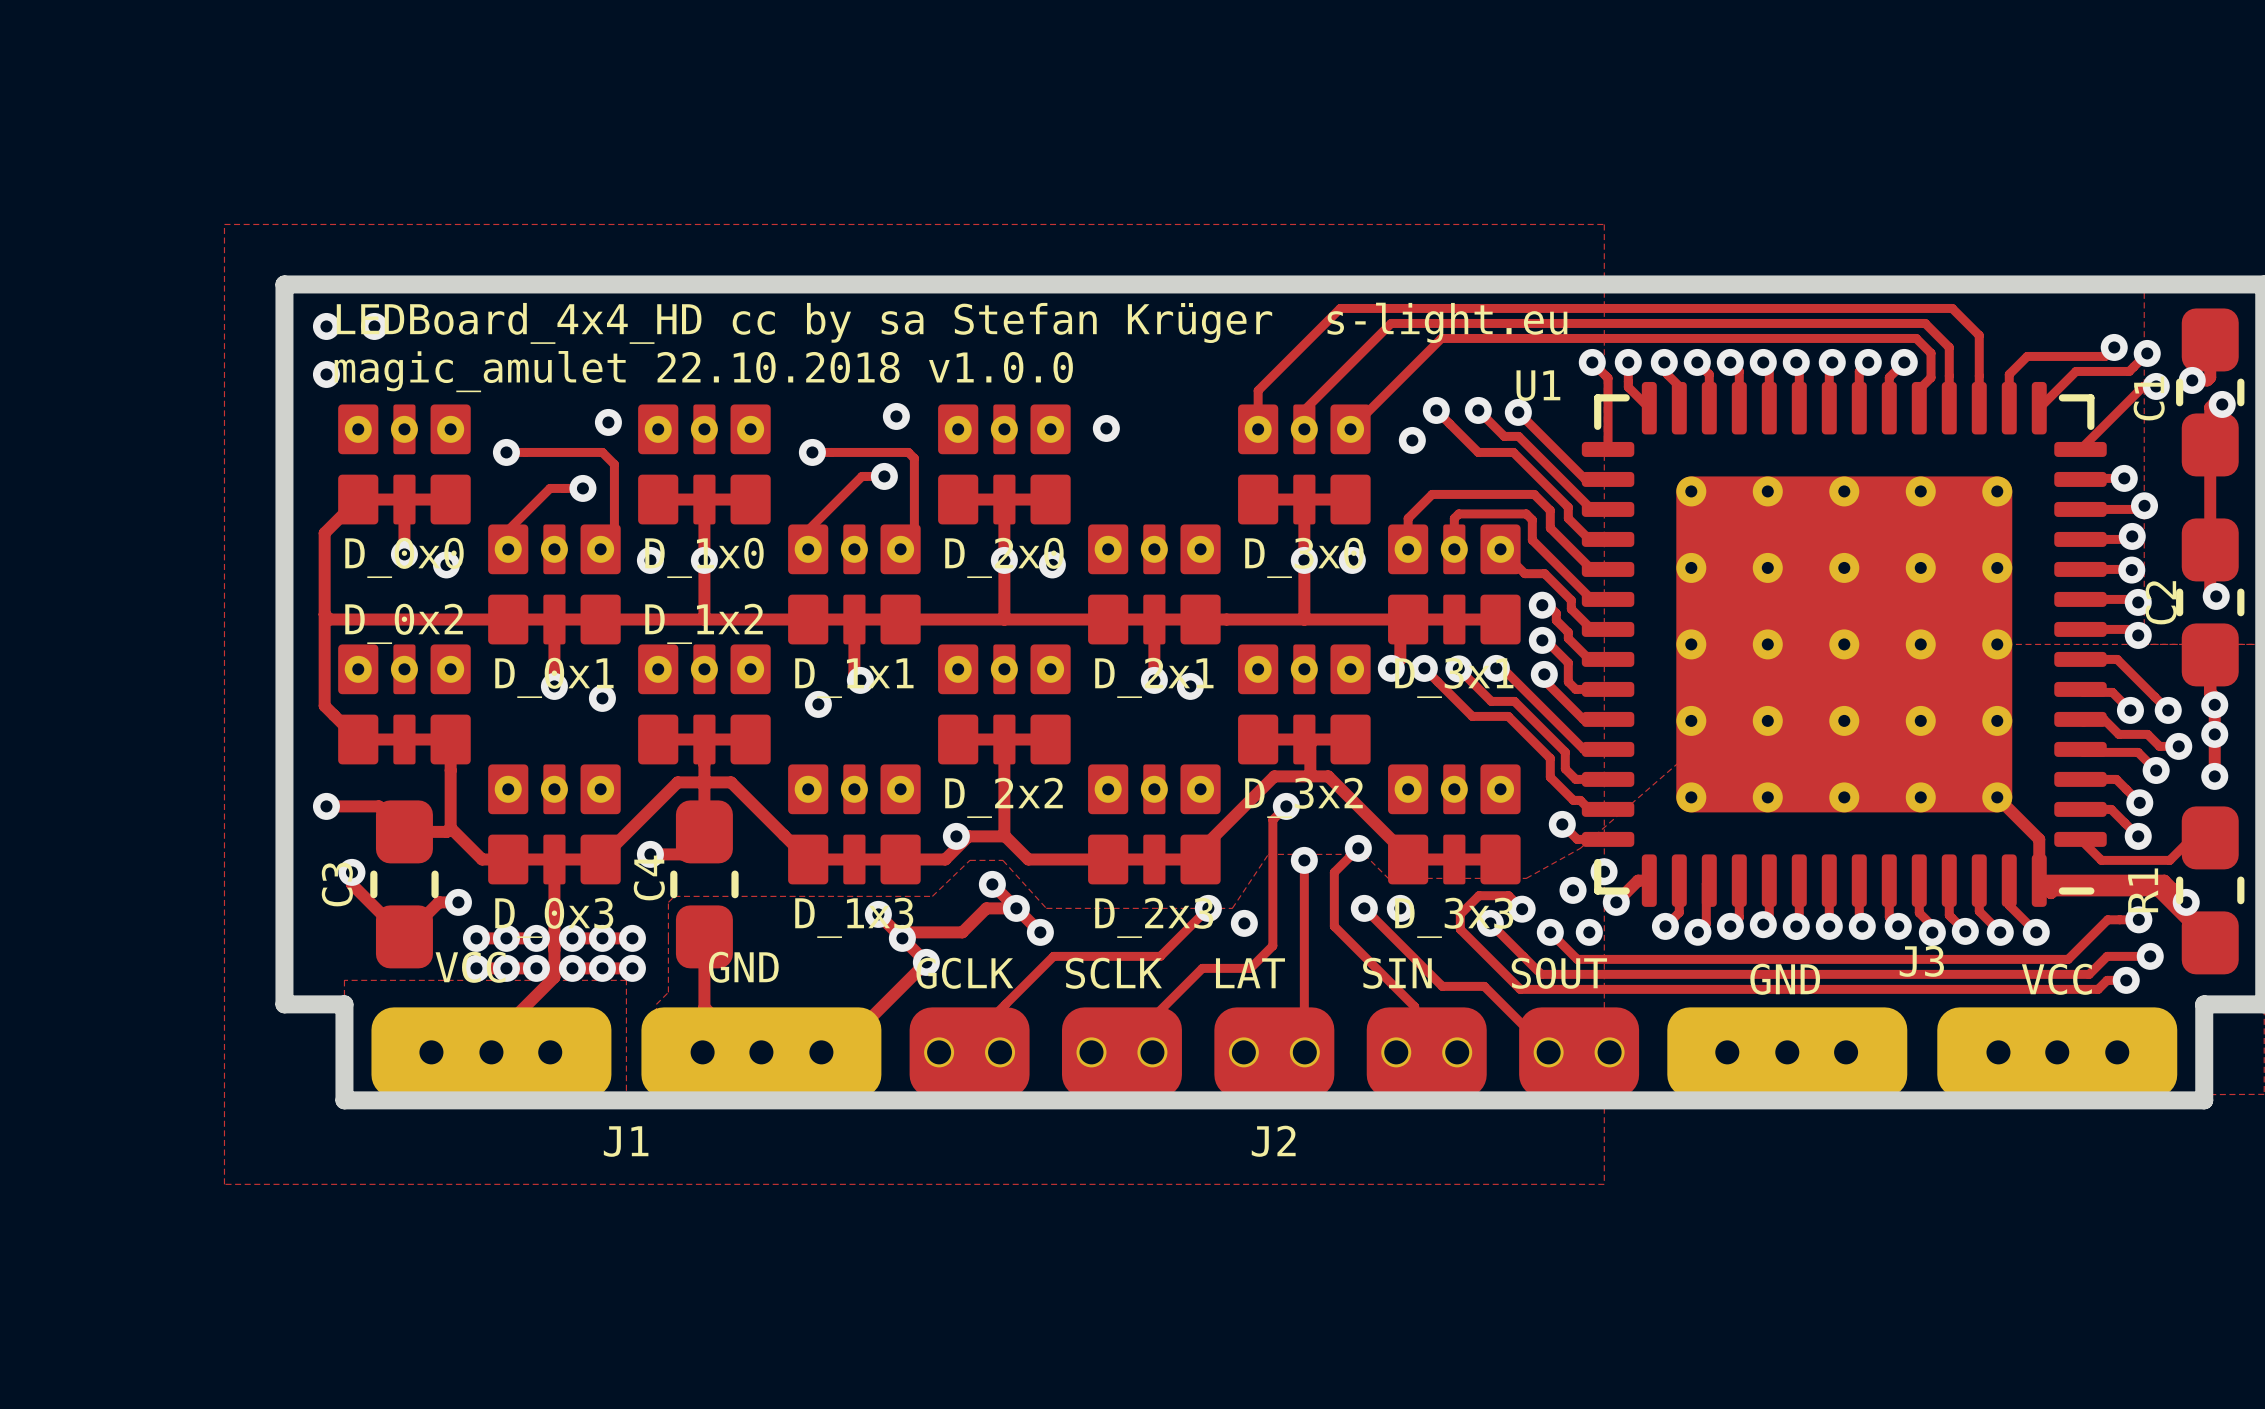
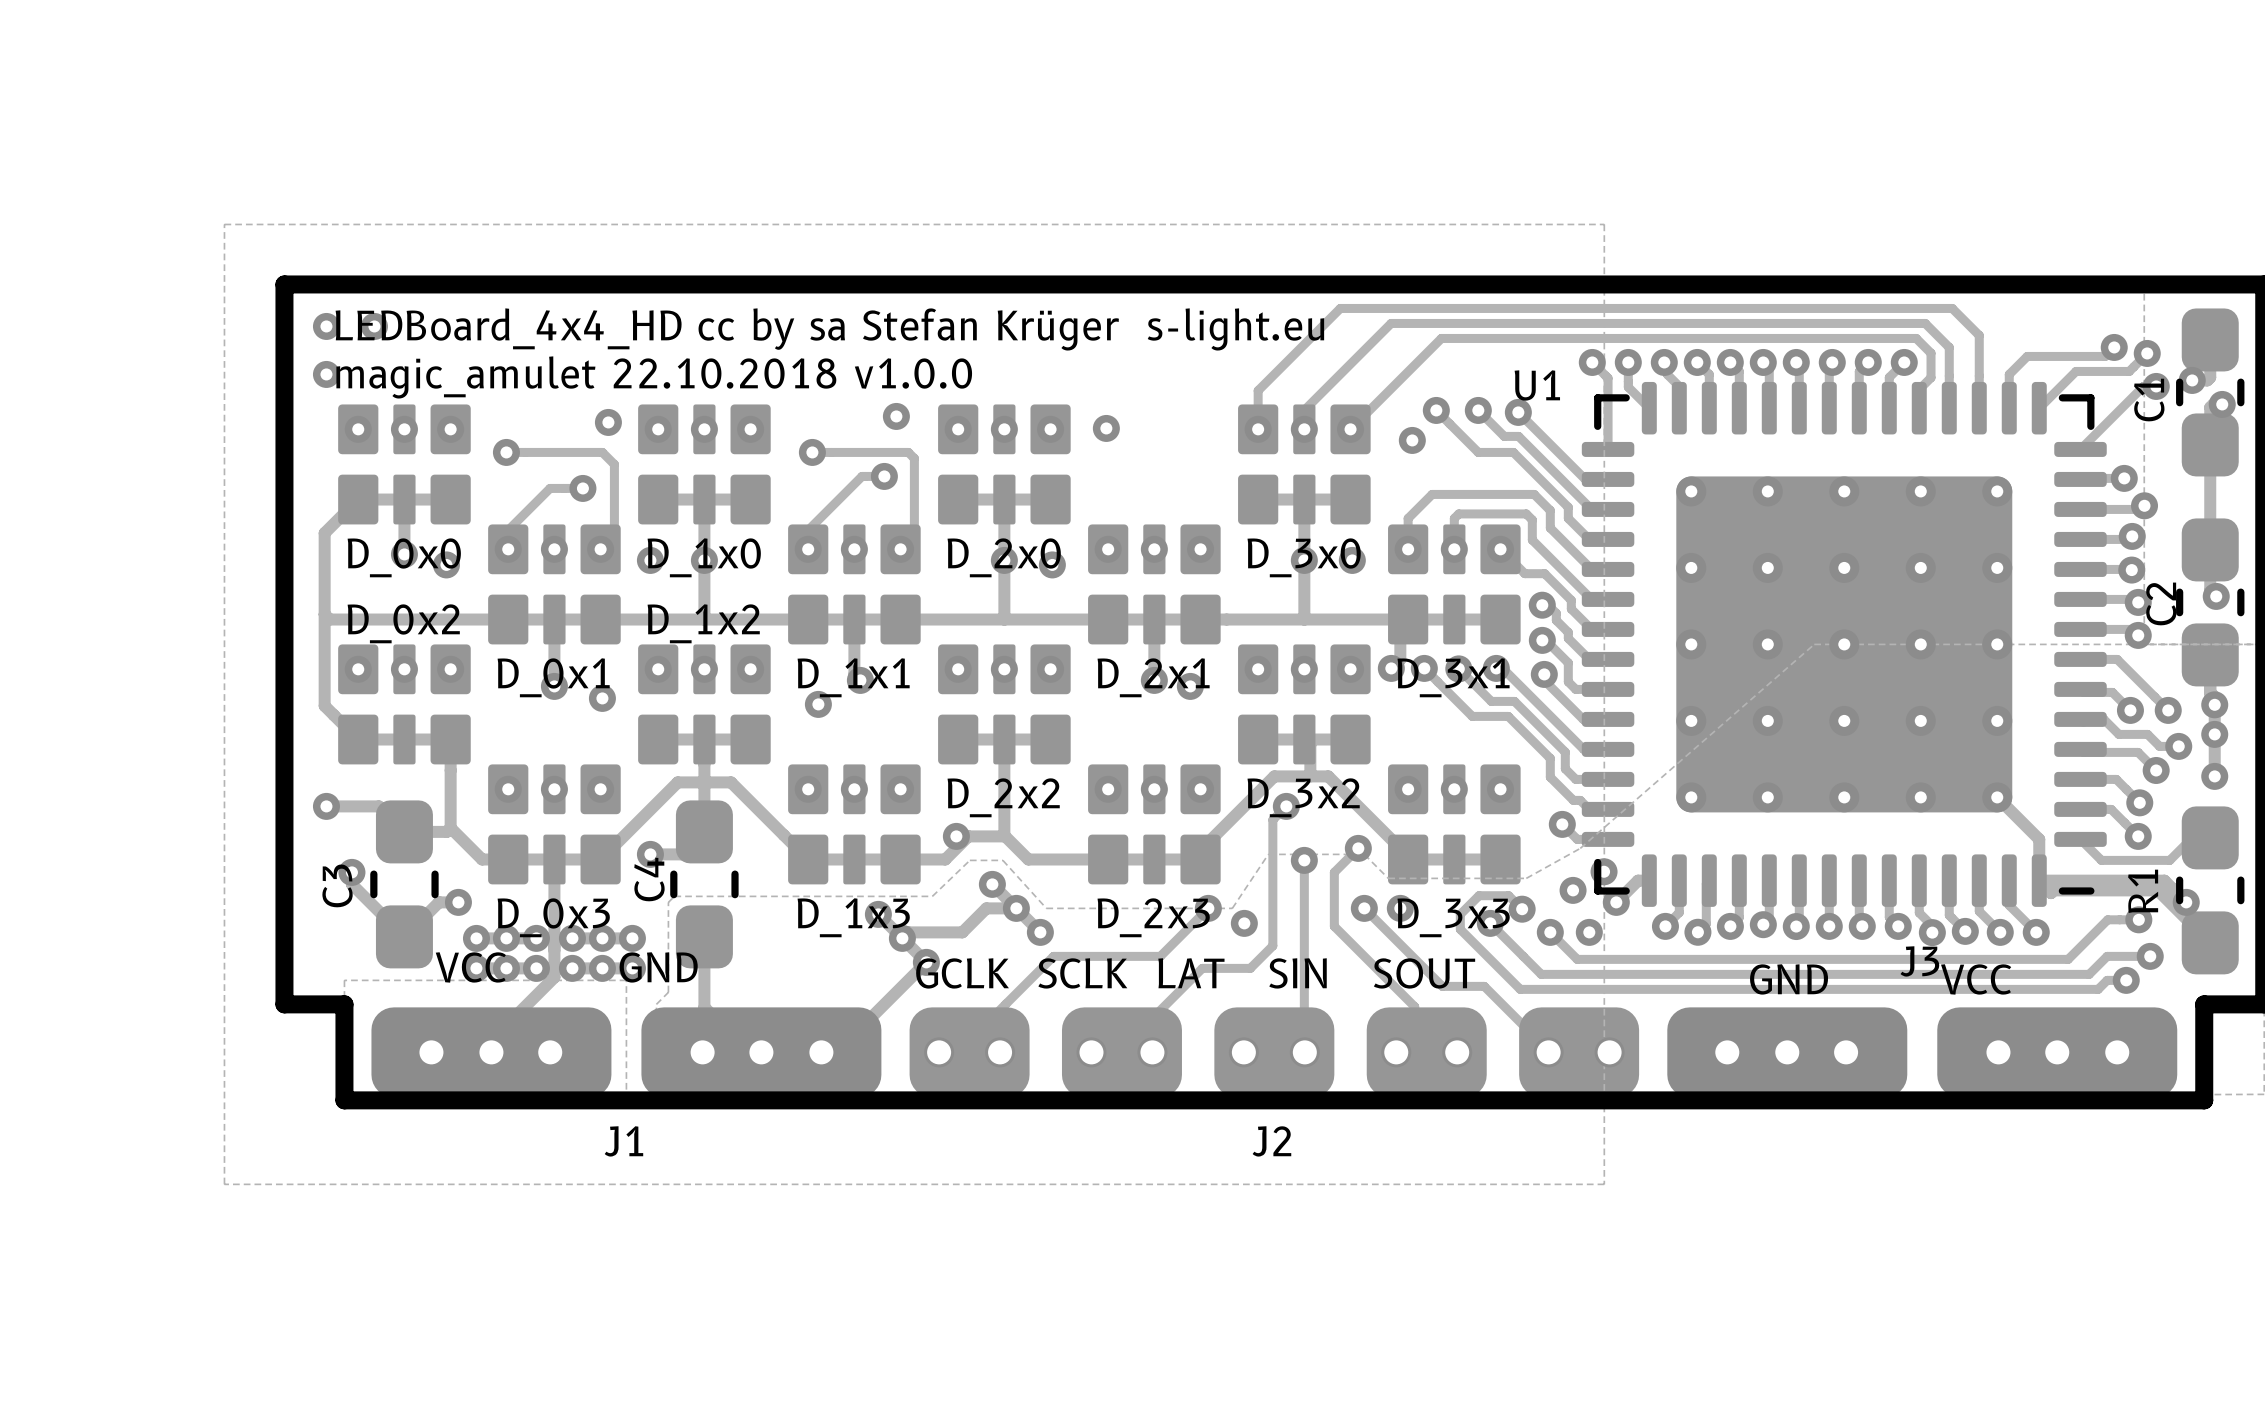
text position: LEDBoard_4x4_HD cc by sa Stefan Krüger s-light.eu (952, 323) -> LEDBoard_4x4_HD cc by sa Stefan Krüger s-light.eu (829, 329)
text position: magic_amulet 22.10.2018 v1.0.0 (703, 371) -> magic_amulet 22.10.2018 v1.0.0 (654, 377)

